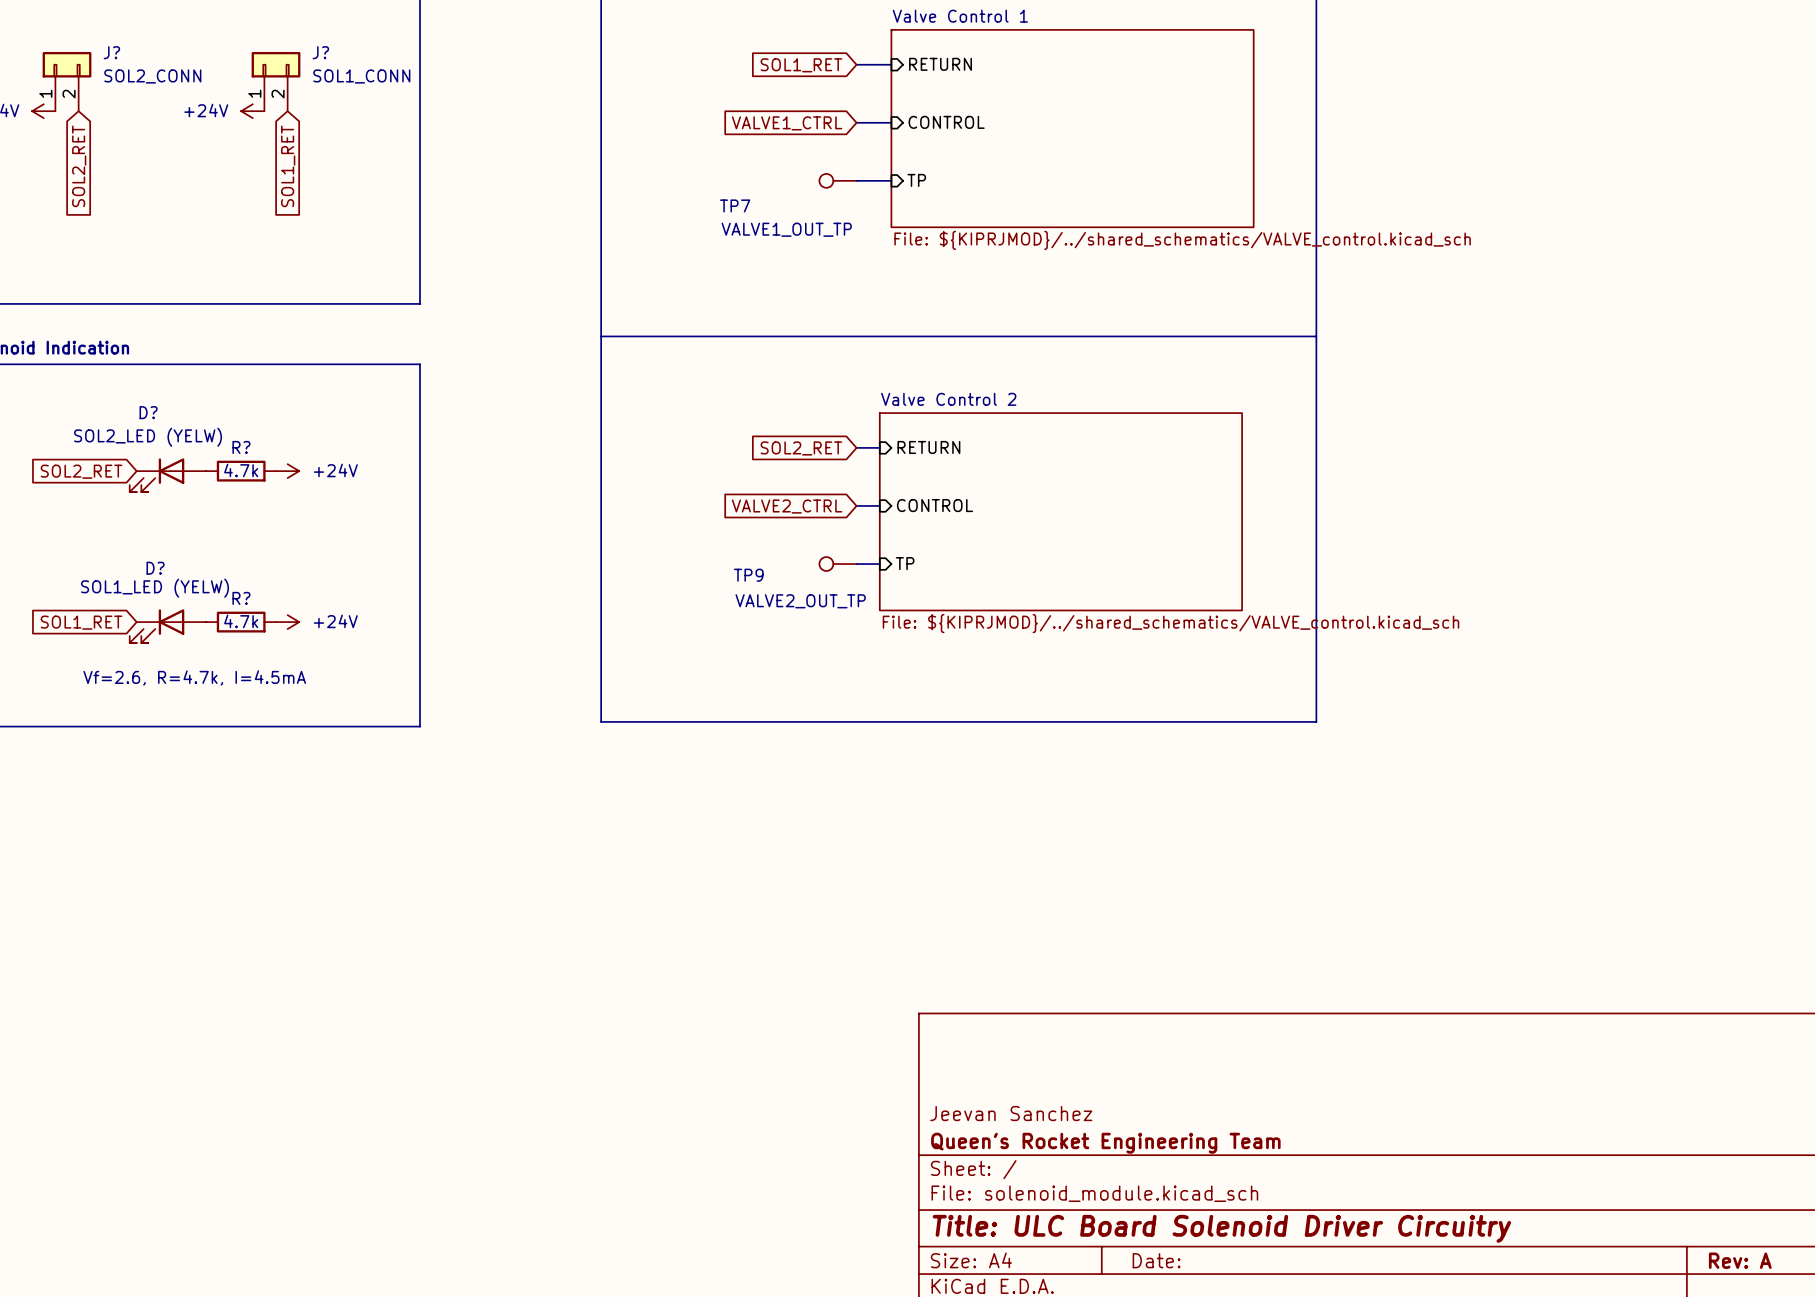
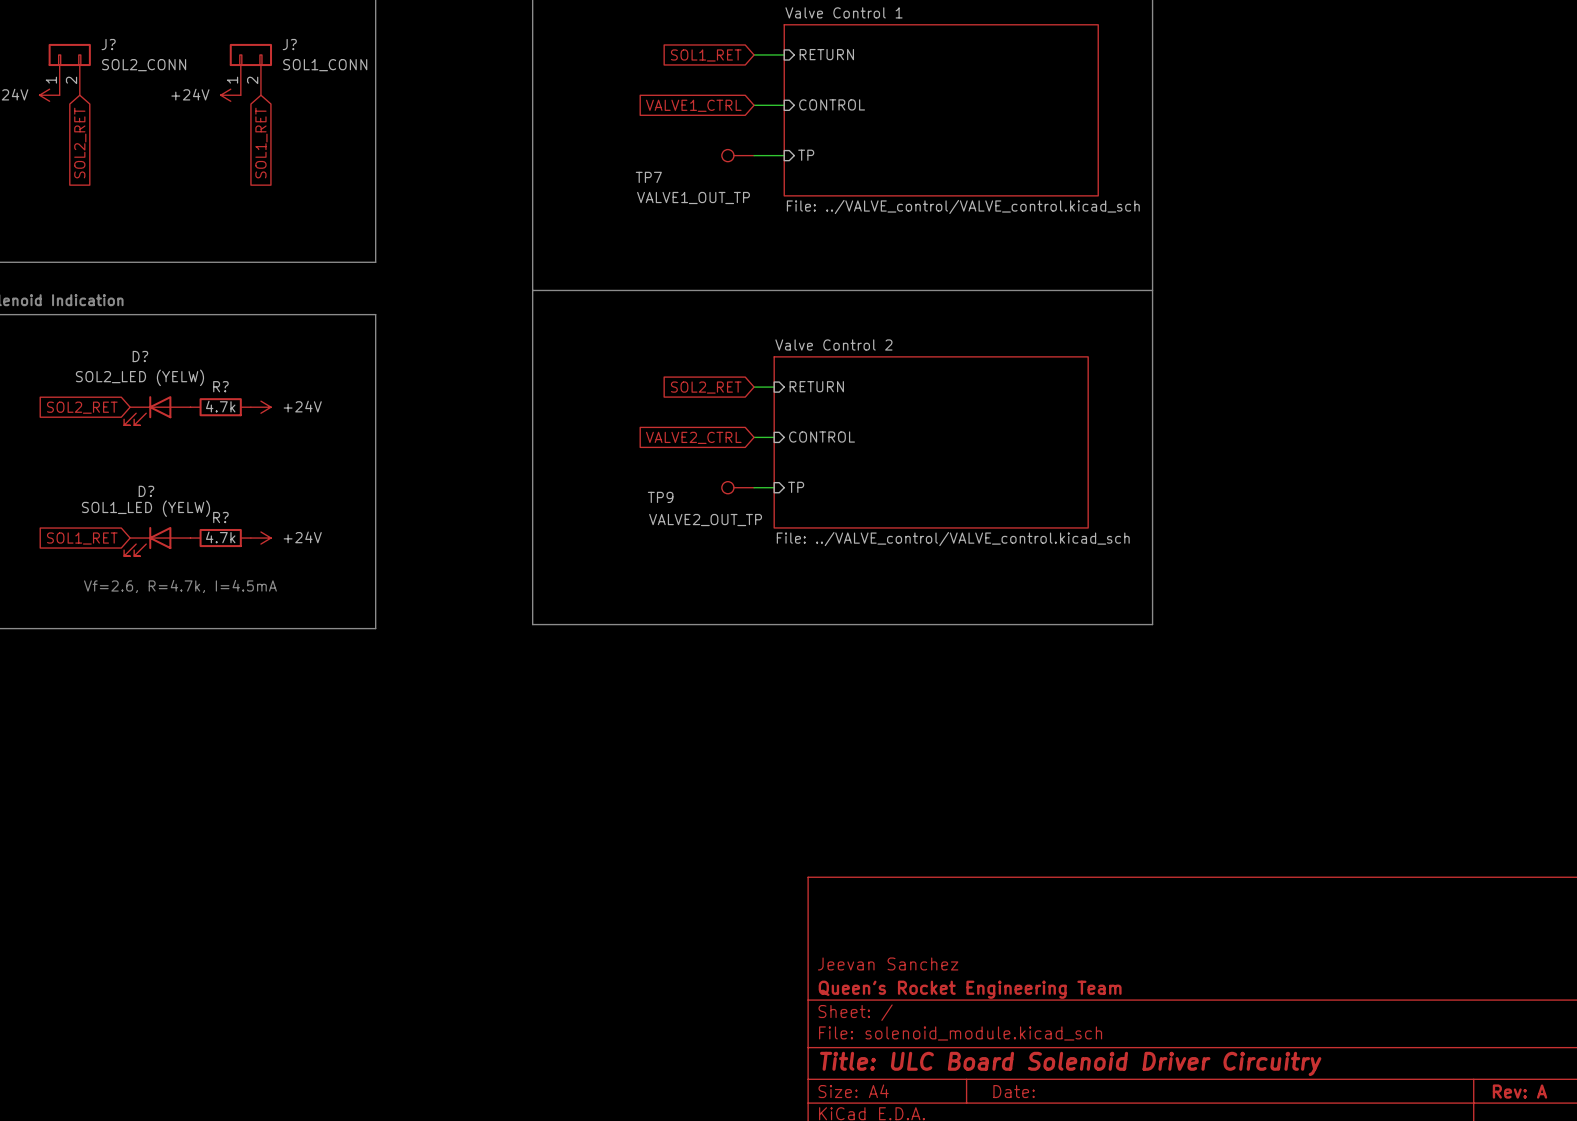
sheet Valve Control 1 value: File: ${KIPRJMOD}/../shared_schematics/VALVE_control.kicad_sch (1182, 240) -> File: ../VALVE_control/VALVE_control.kicad_sch (963, 206)
sheet Valve Control 2 value: File: ${KIPRJMOD}/../shared_schematics/VALVE_control.kicad_sch (1170, 623) -> File: ../VALVE_control/VALVE_control.kicad_sch (953, 539)

